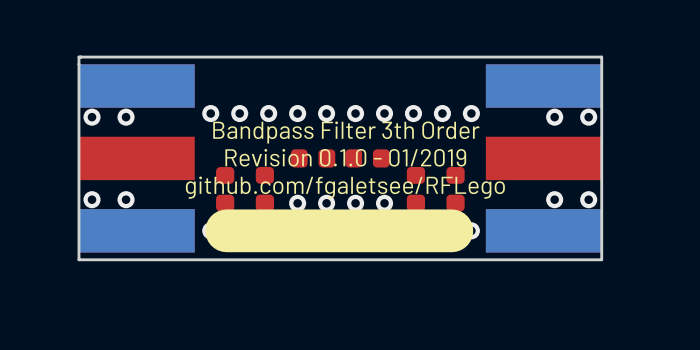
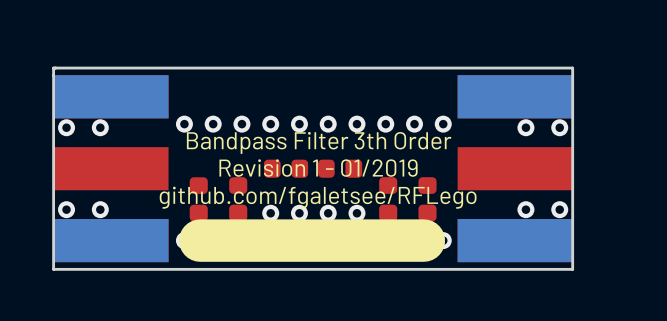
text: Revision 0.1.0 - 01/2019 (345, 157) -> Revision 1 - 01/2019 (318, 168)

